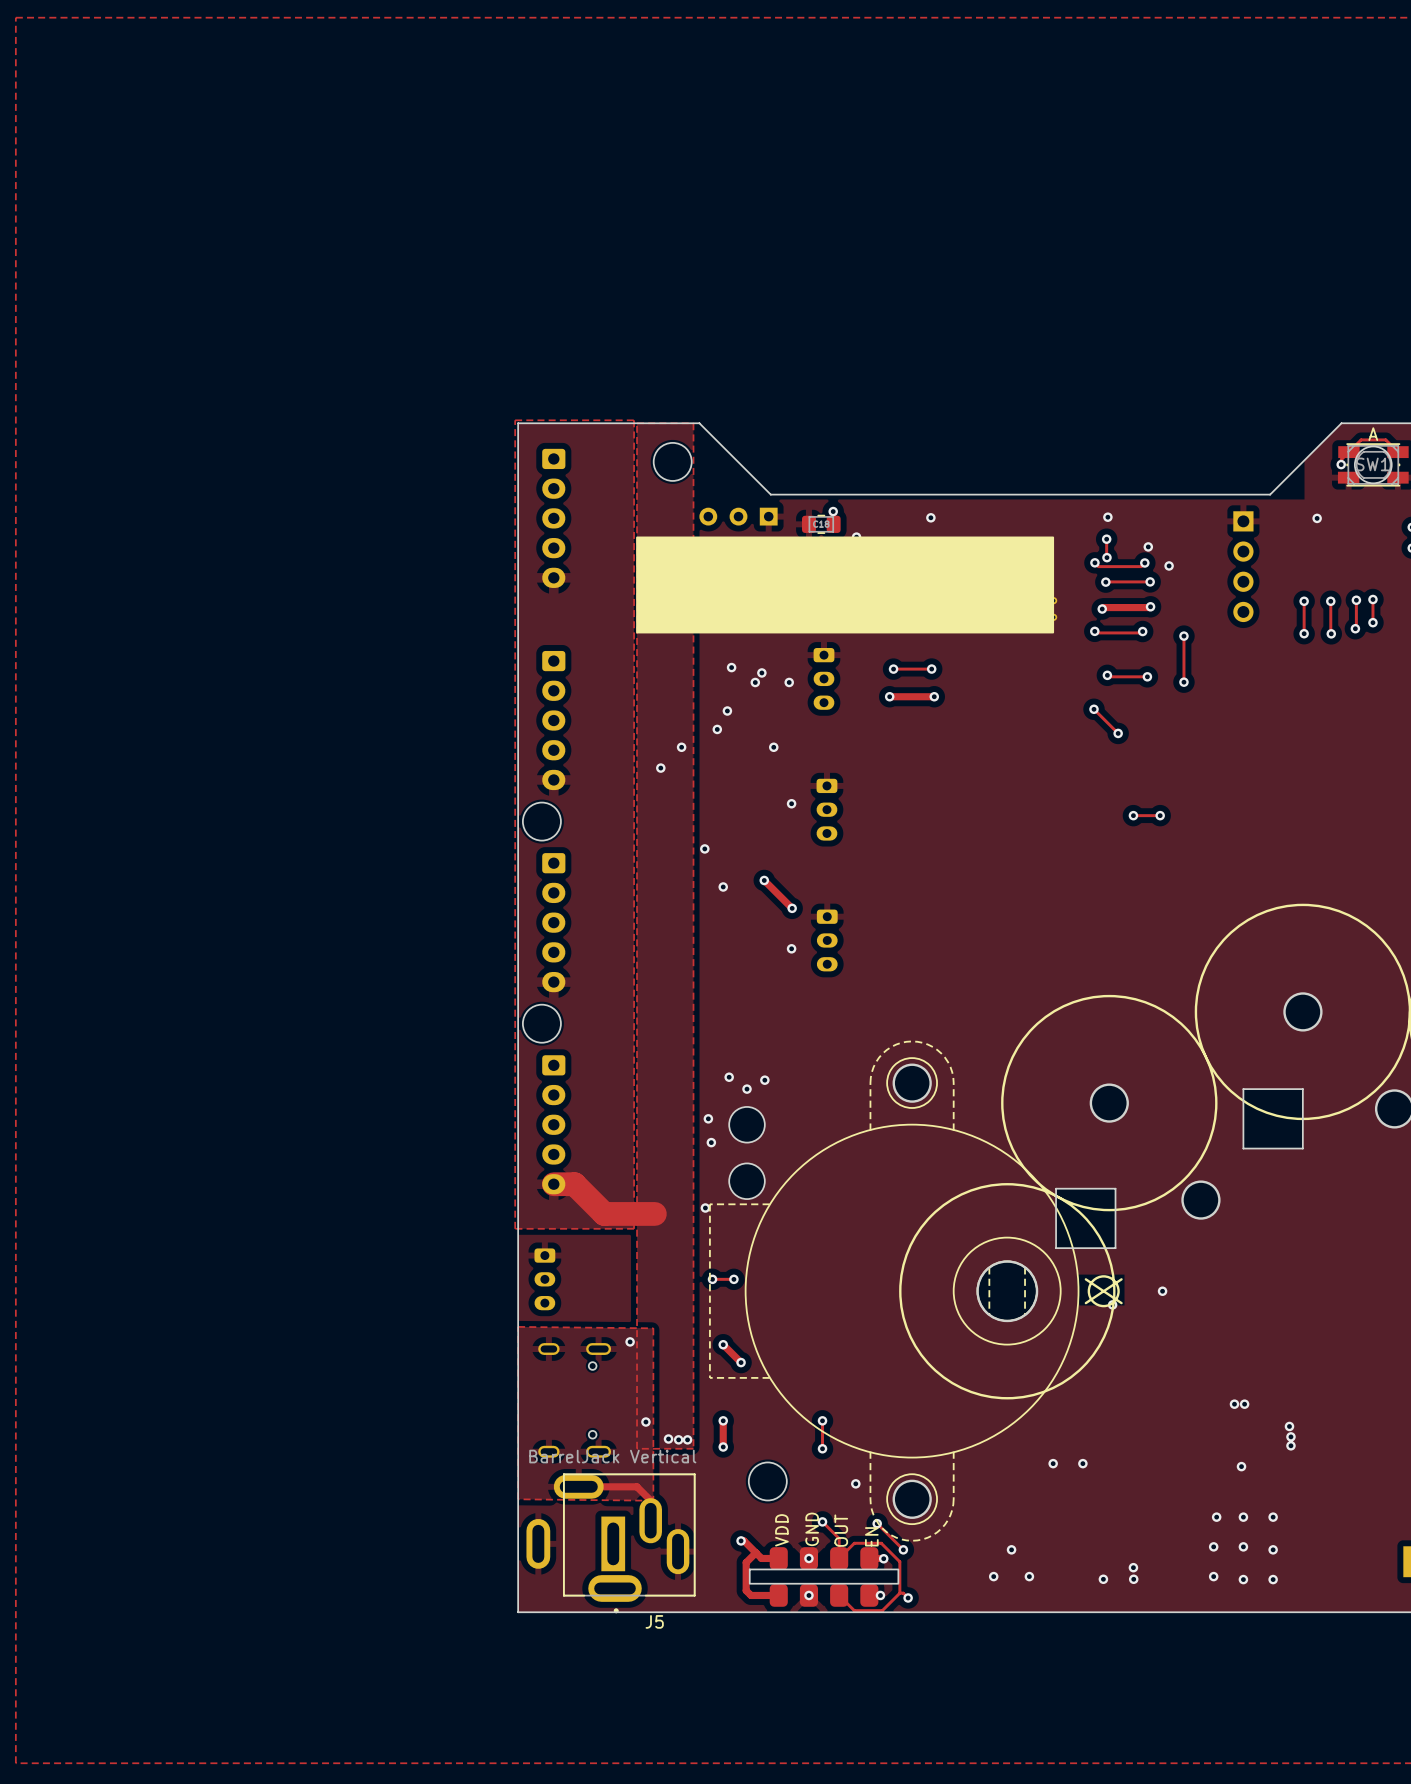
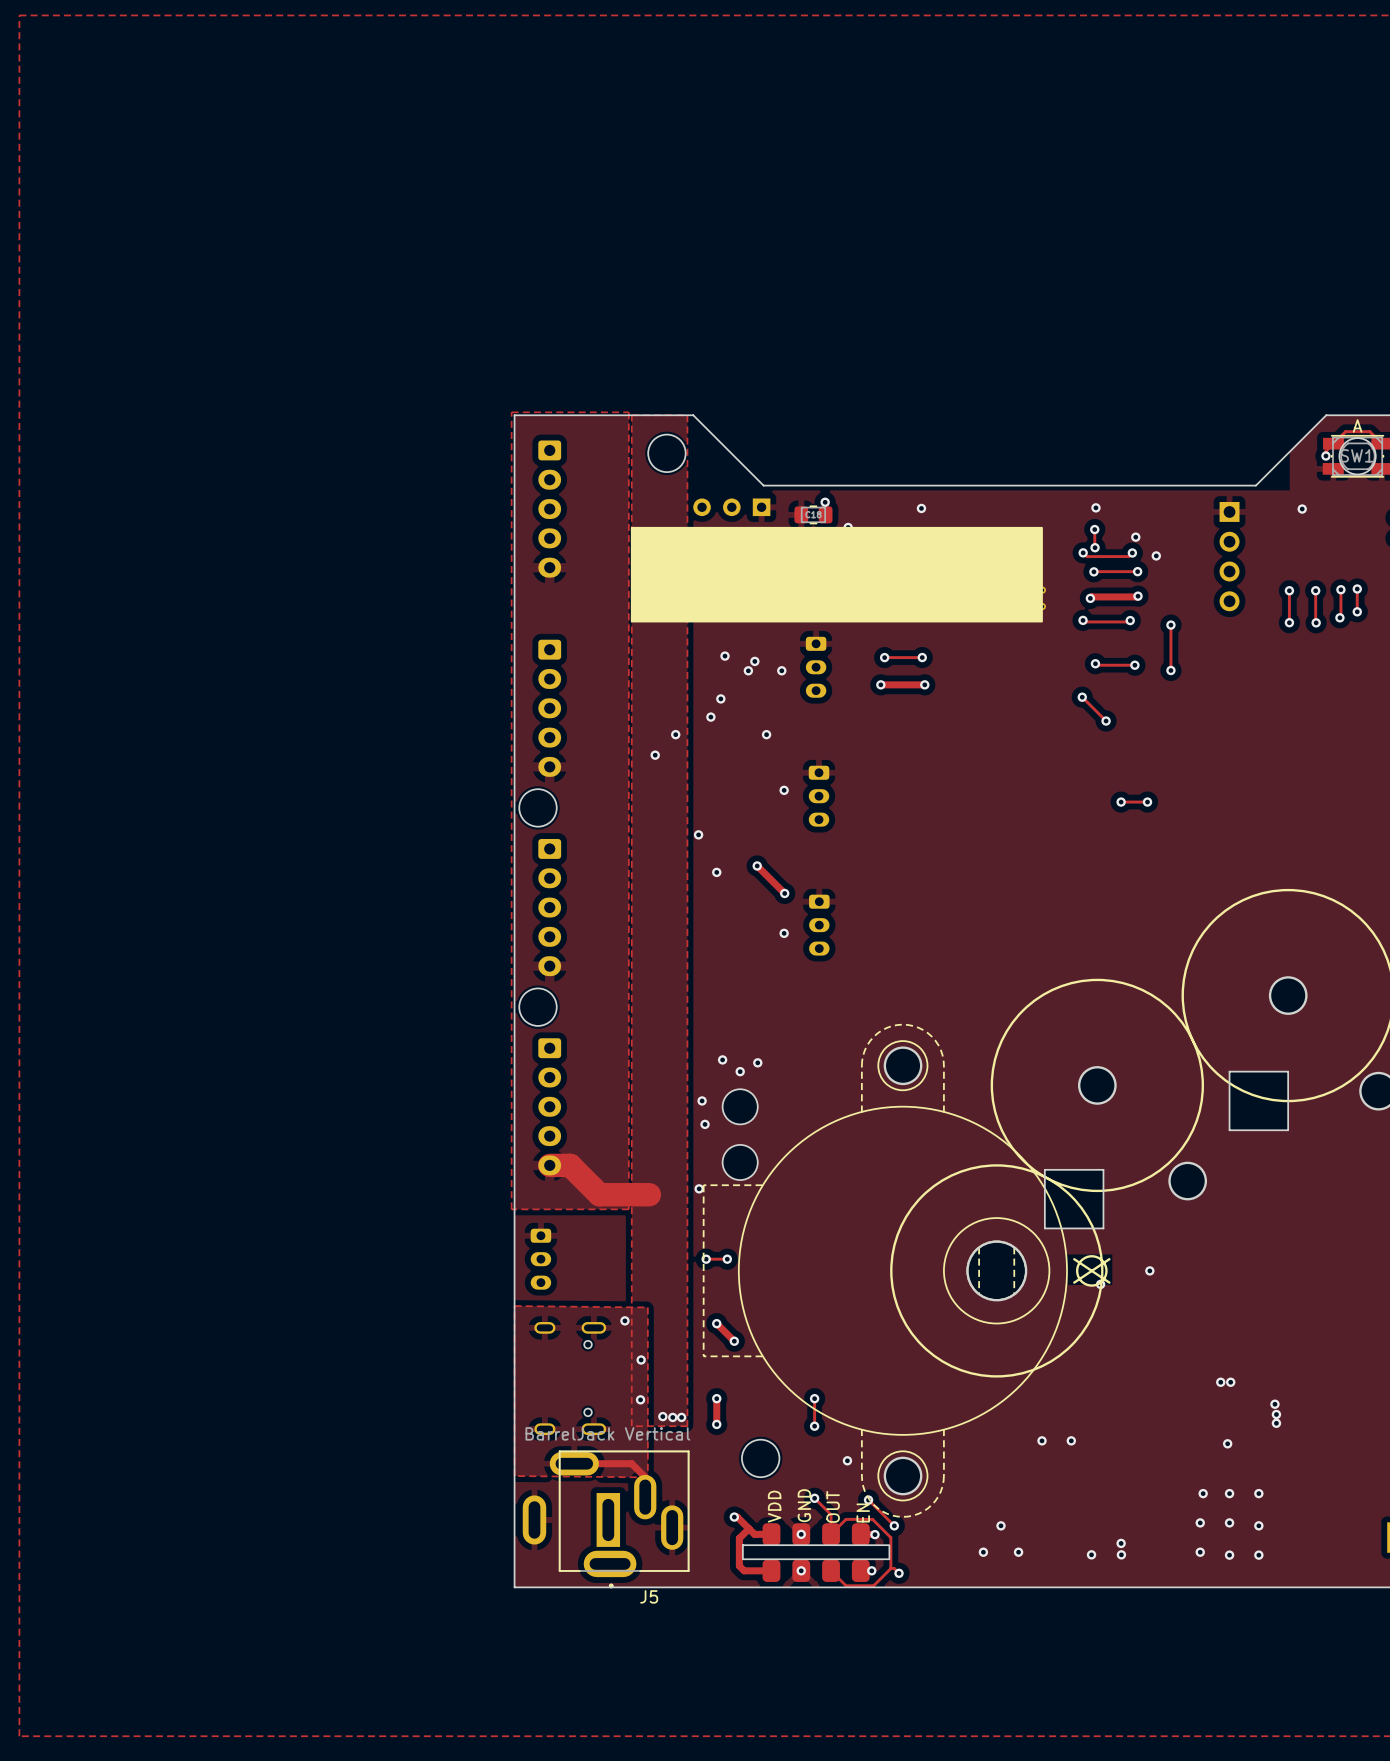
via: none -> (641, 1359)

